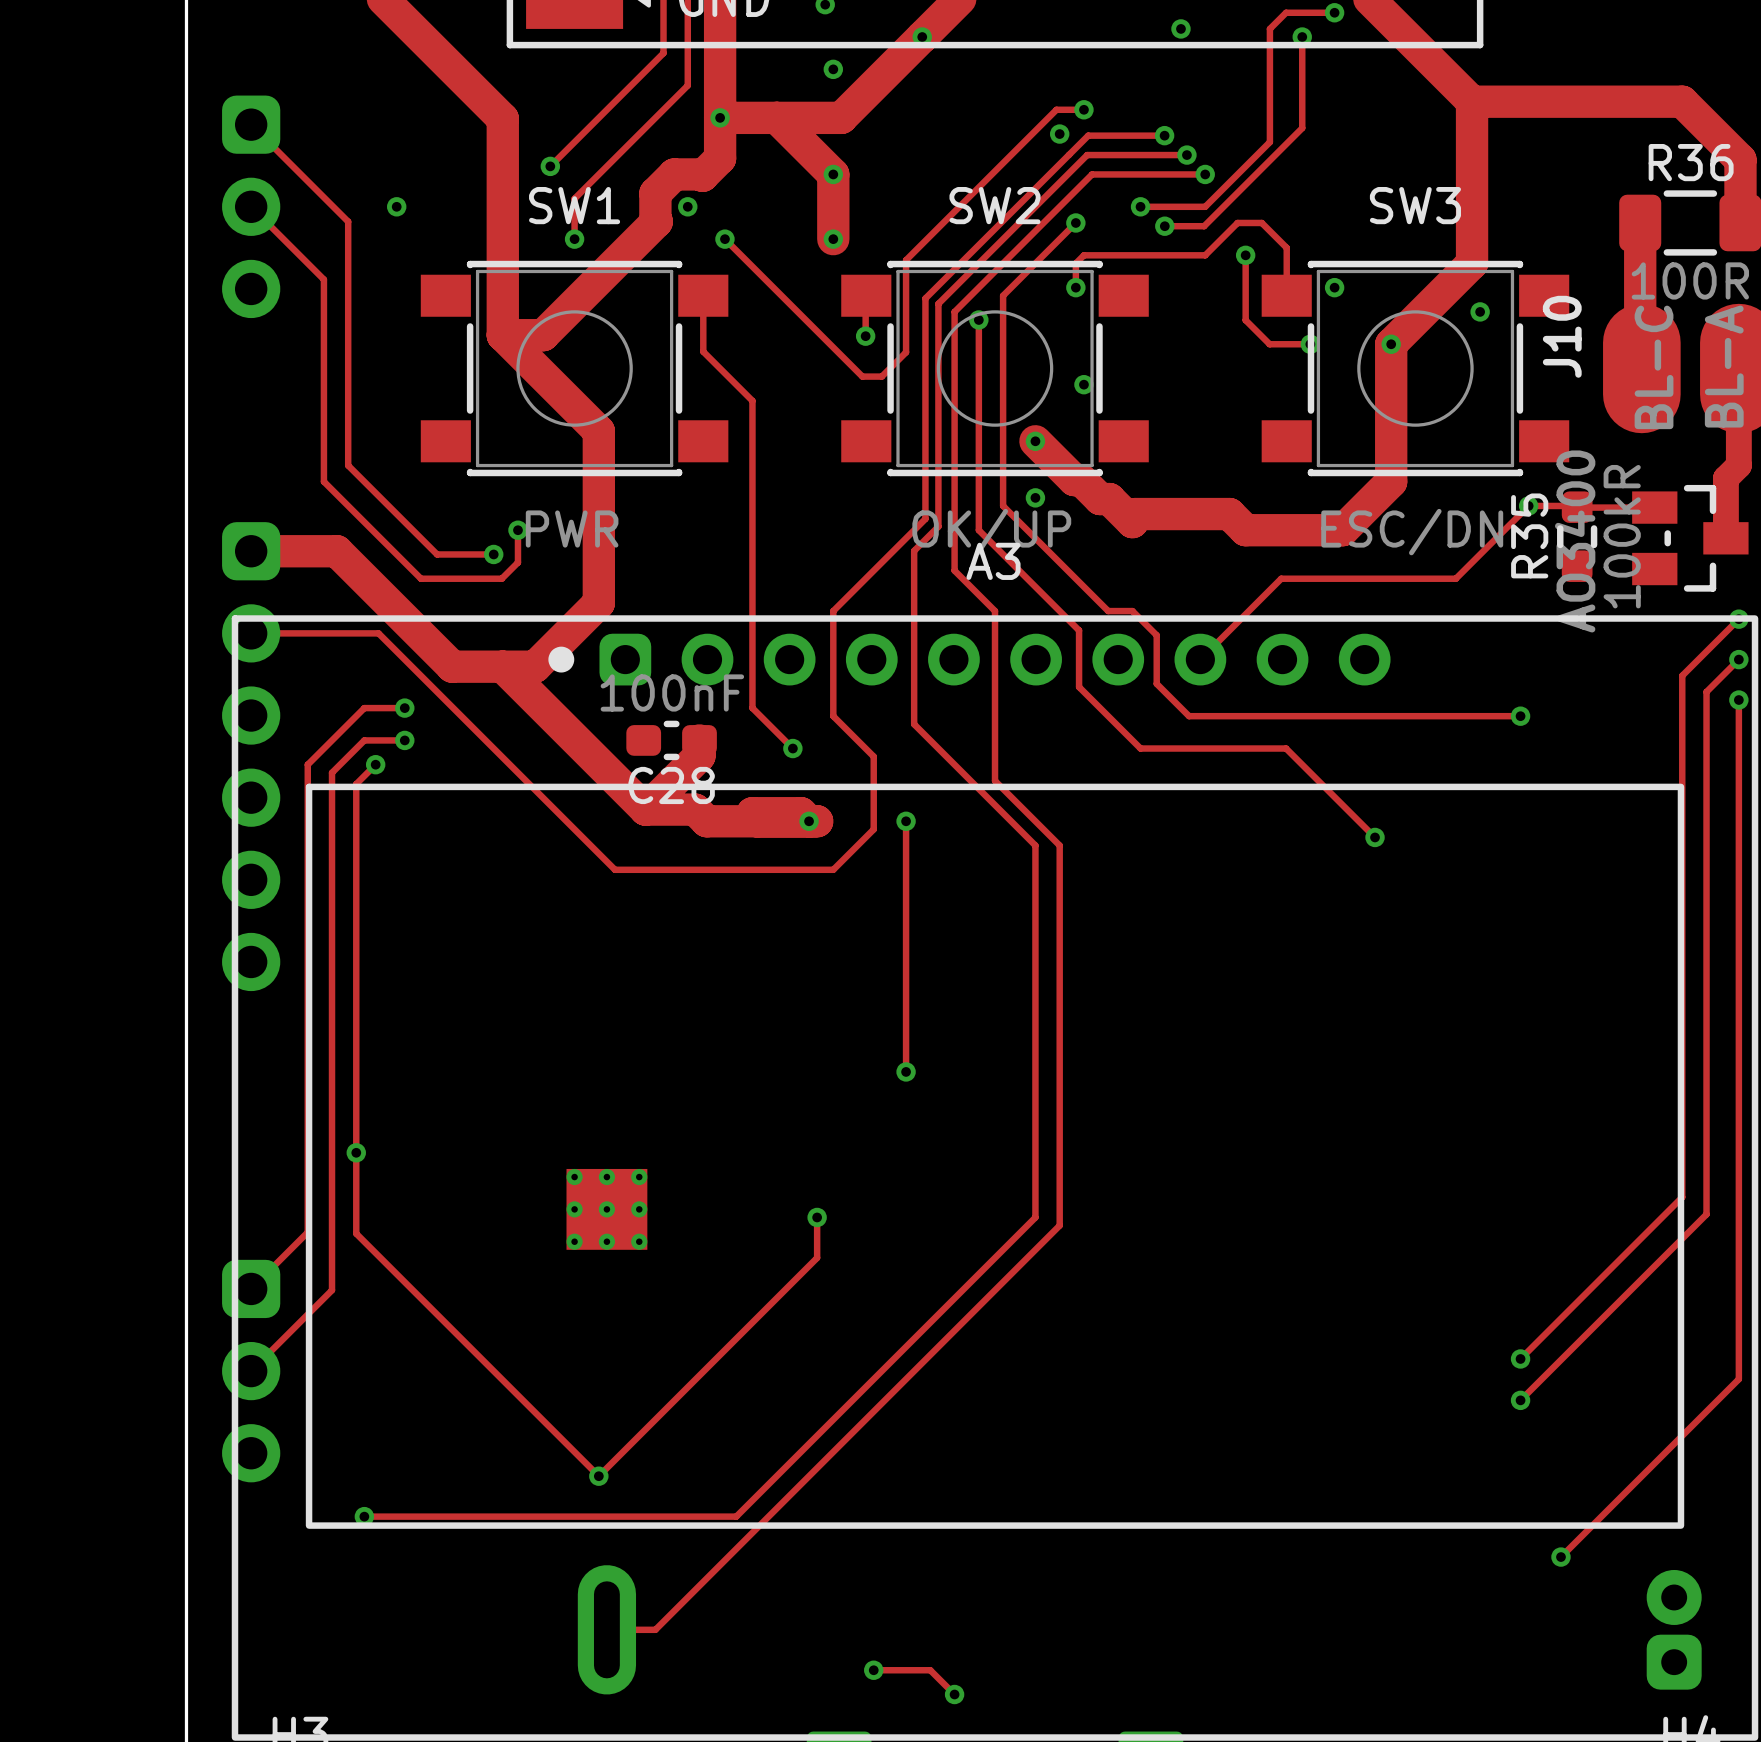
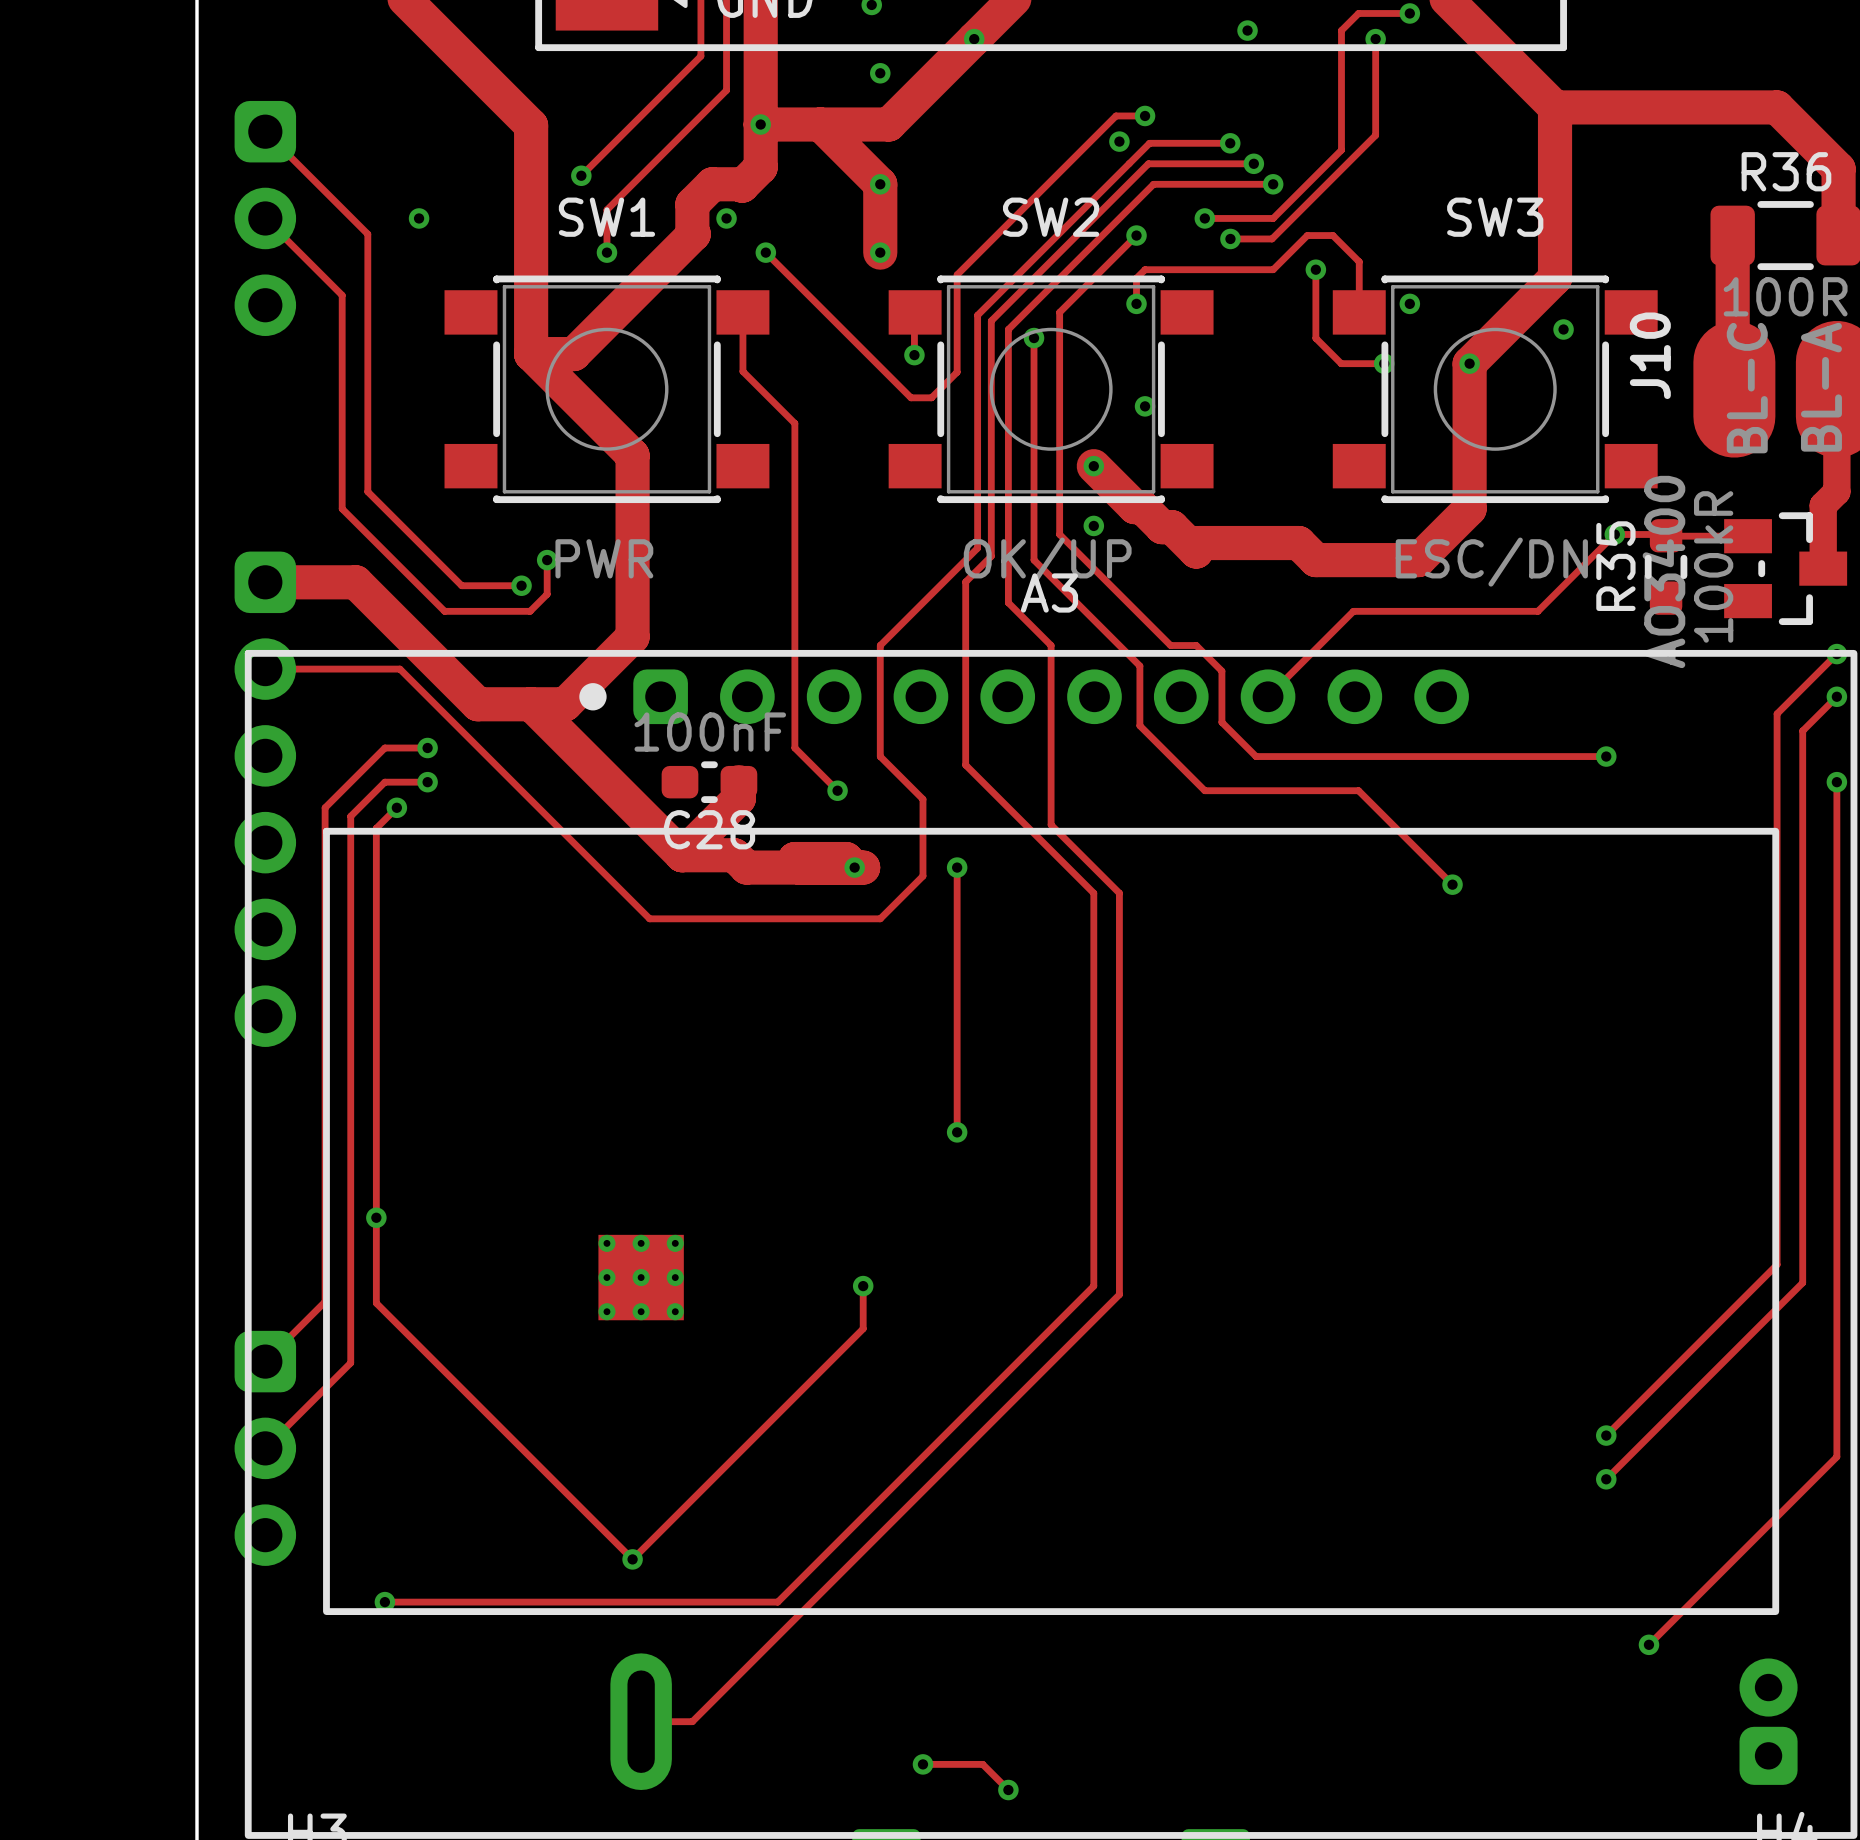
track: (1738, 700) (1738, 740) -> none
via position: (1738, 700) -> (1836, 782)

